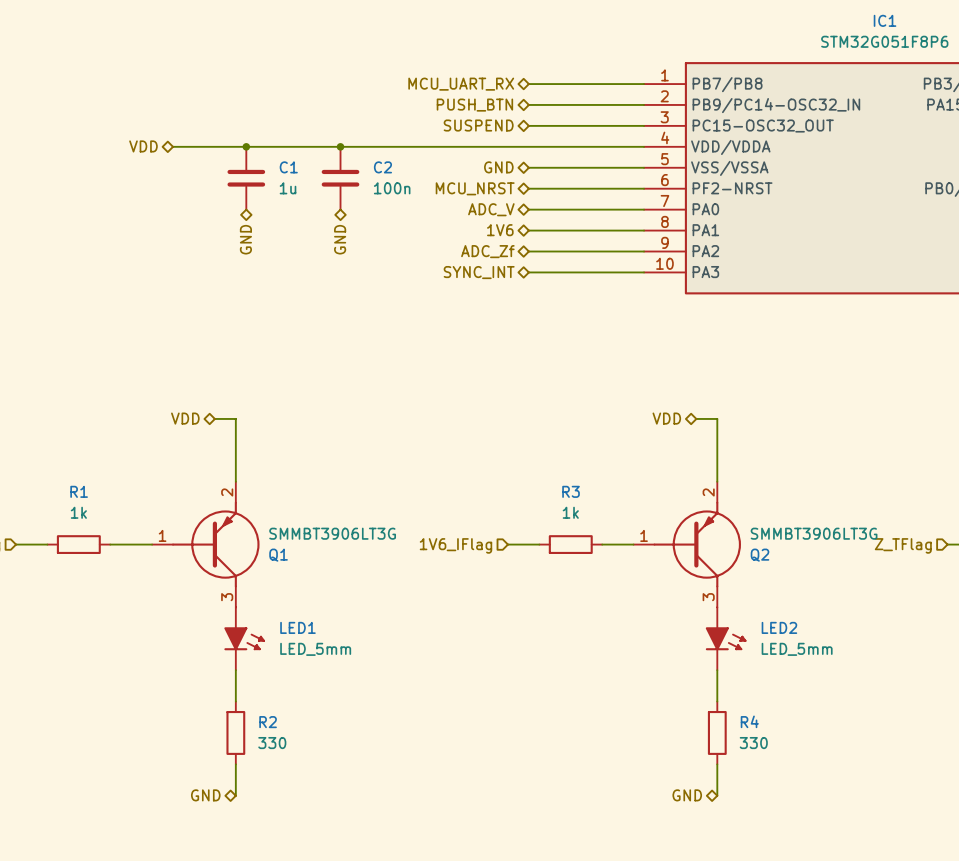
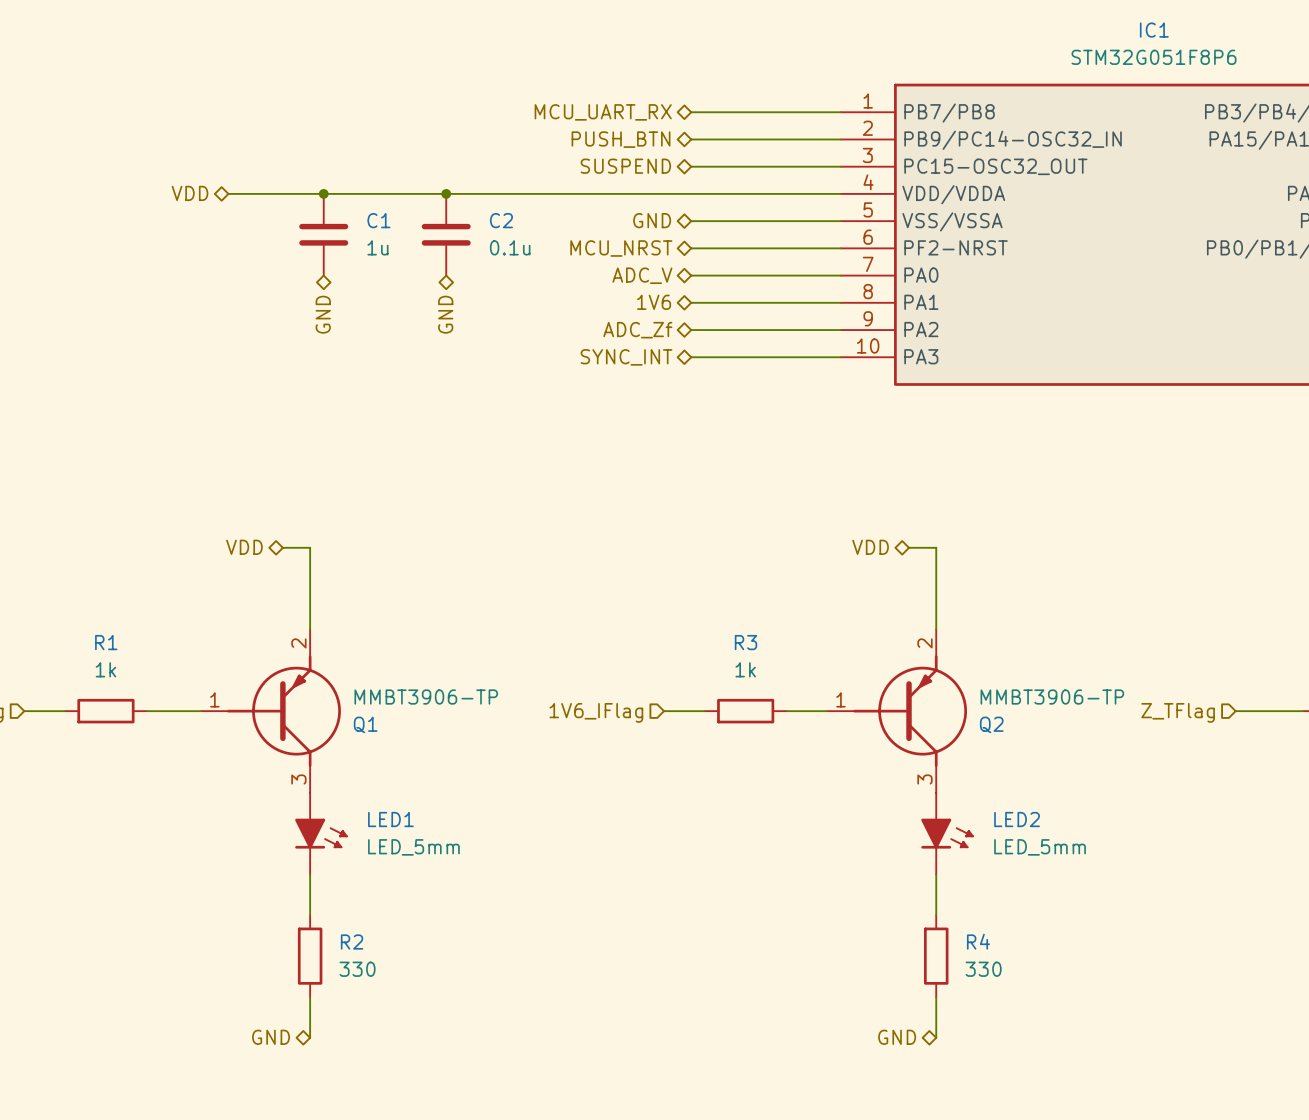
C2 value: 100n (392, 188) -> 0.1u (510, 247)
Q1 value: SMMBT3906LT3G (332, 533) -> MMBT3906-TP (426, 697)
Q2 value: SMMBT3906LT3G (814, 533) -> MMBT3906-TP (1052, 697)

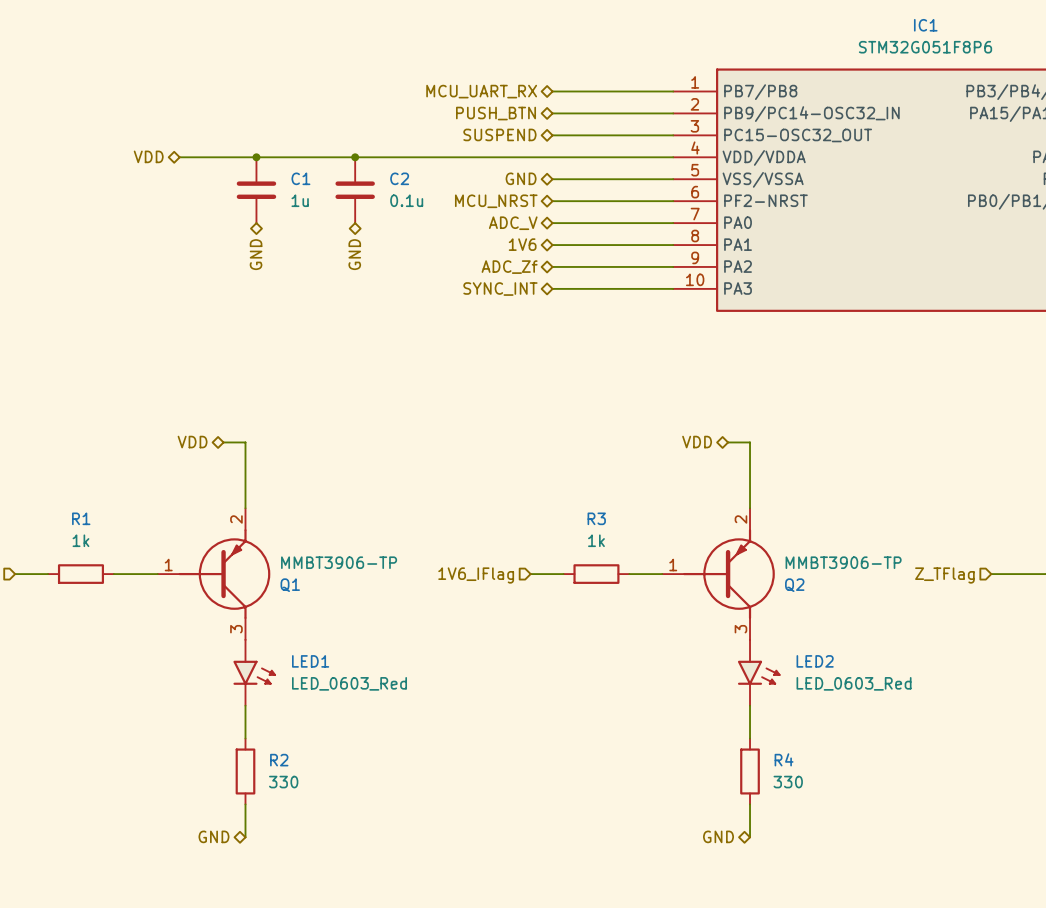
LED1 symbol: [295, 792, 348, 875] -> [233, 639, 276, 706]
LED2 symbol: [921, 792, 974, 875] -> [737, 639, 781, 706]
LED1 value: LED_5mm (413, 847) -> LED_0603_Red (349, 683)
LED2 value: LED_5mm (1040, 847) -> LED_0603_Red (854, 683)

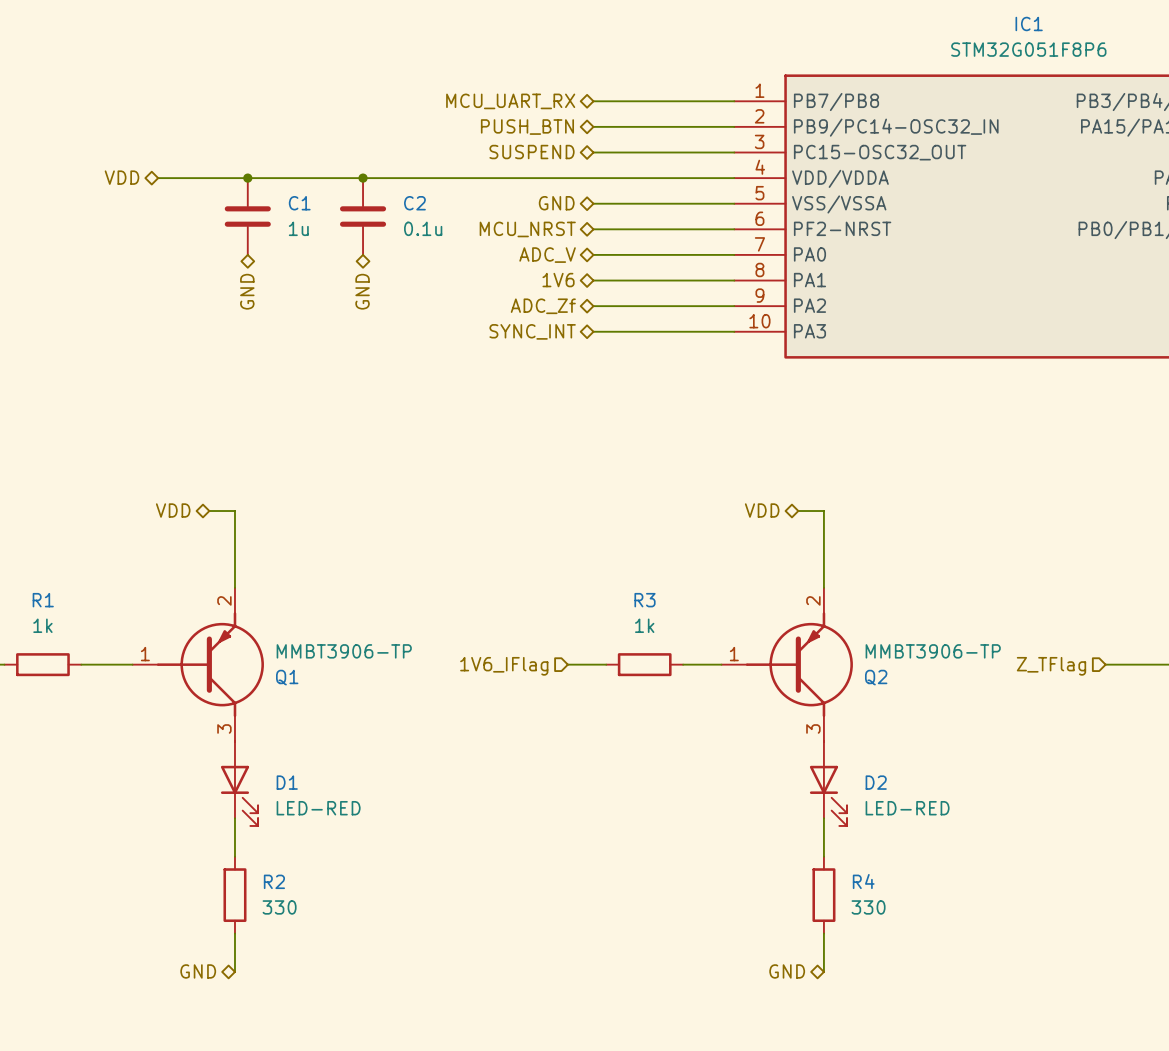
LED1: LED_0603_Red (254, 672) -> none
LED2: LED_0603_Red (759, 672) -> none
D1: none -> LED-RED (239, 783)
D2: none -> LED-RED (828, 783)

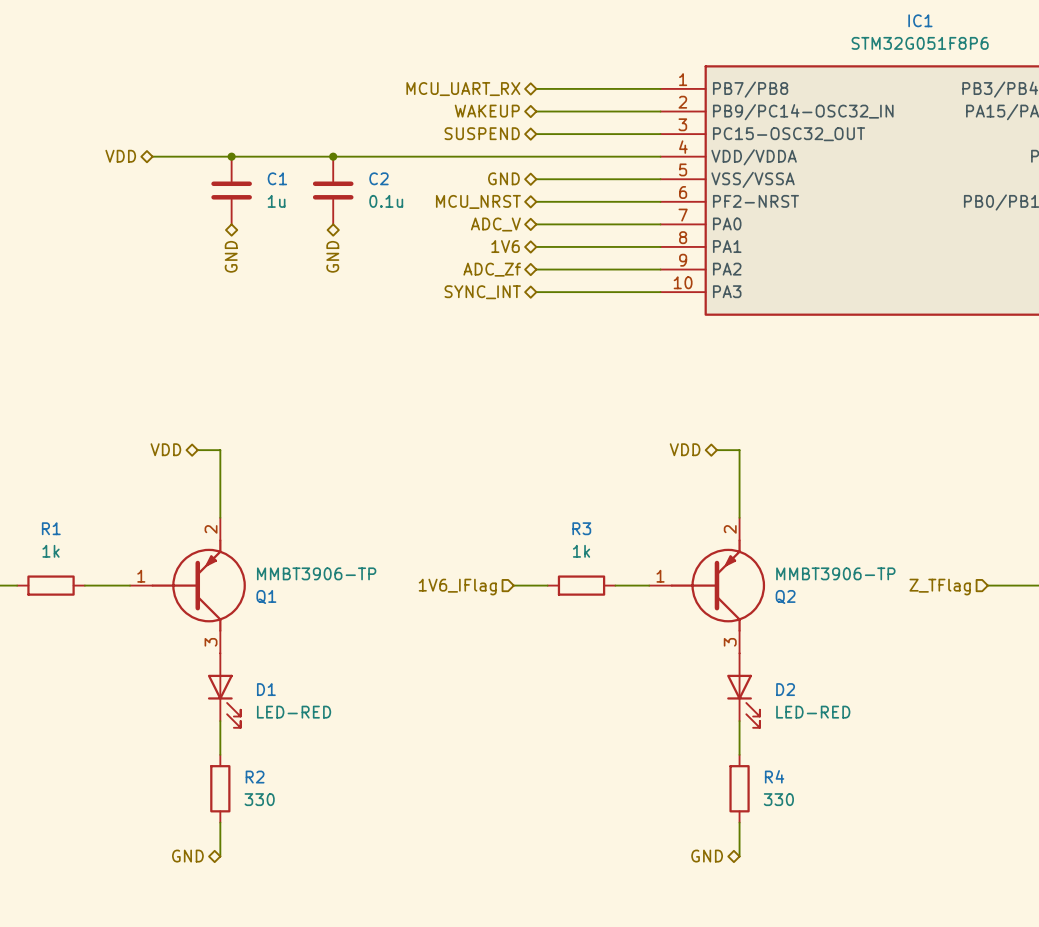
hierarchical label: PUSH_BTN (527, 127) -> WAKEUP (487, 111)

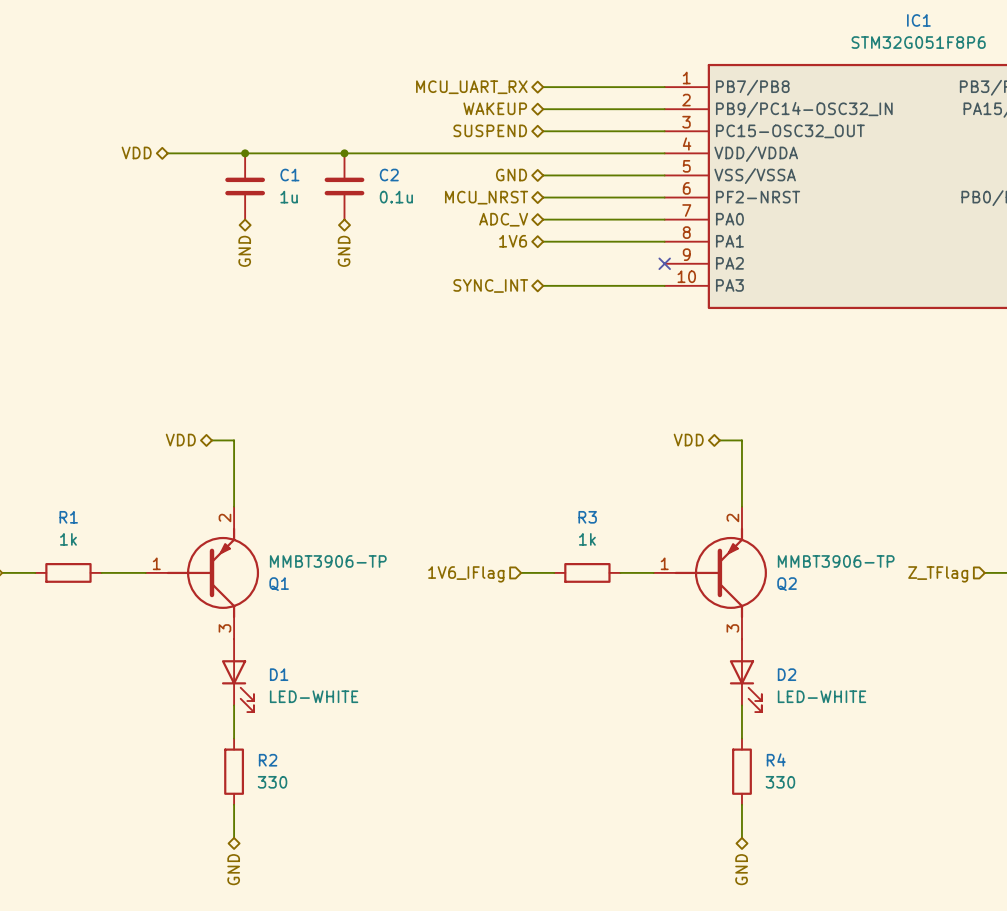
hierarchical label: ADC_Zf (492, 269) -> none
wire: (536, 269) (660, 269) -> none
no-connect mark: none -> (664, 263)
D1 value: LED-RED (294, 712) -> LED-WHITE (314, 696)
D2 value: LED-RED (813, 712) -> LED-WHITE (821, 696)
hierarchical label rotation: 0° (187, 856) -> 90° counterclockwise (233, 869)
hierarchical label position: GND (187, 856) -> GND (233, 869)
hierarchical label rotation: 0° (707, 856) -> 90° counterclockwise (741, 869)
hierarchical label position: GND (707, 856) -> GND (741, 869)

